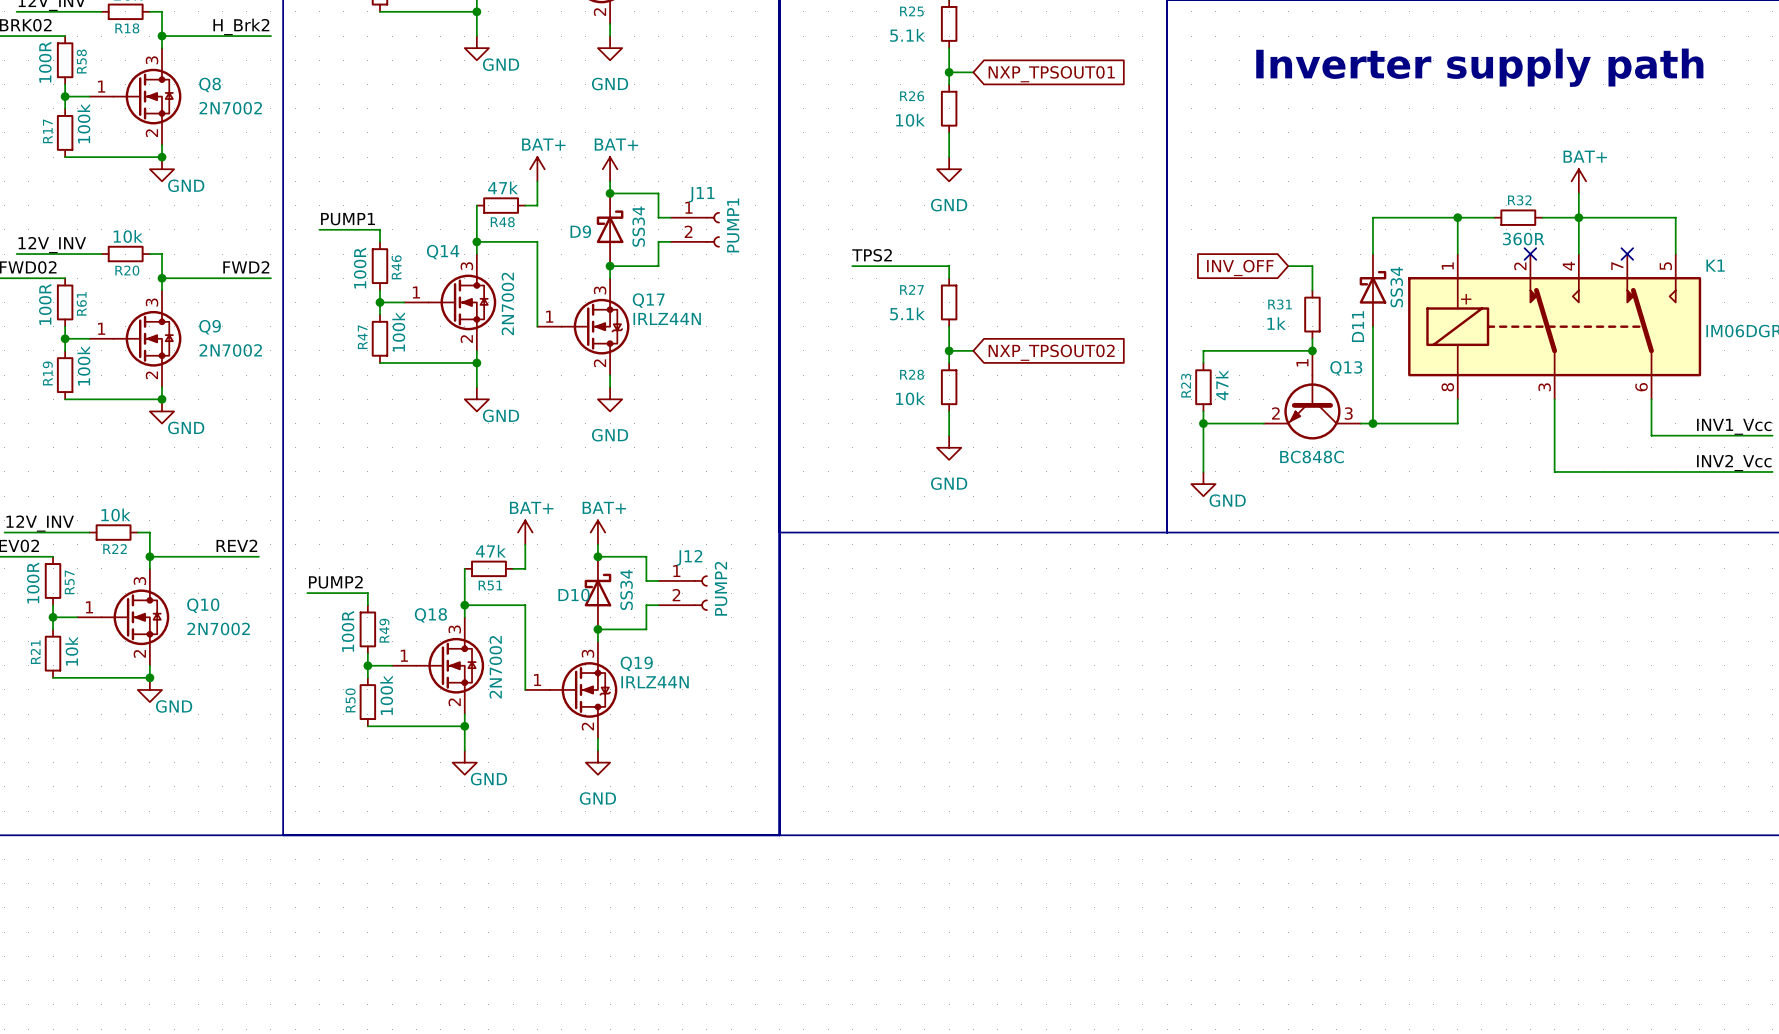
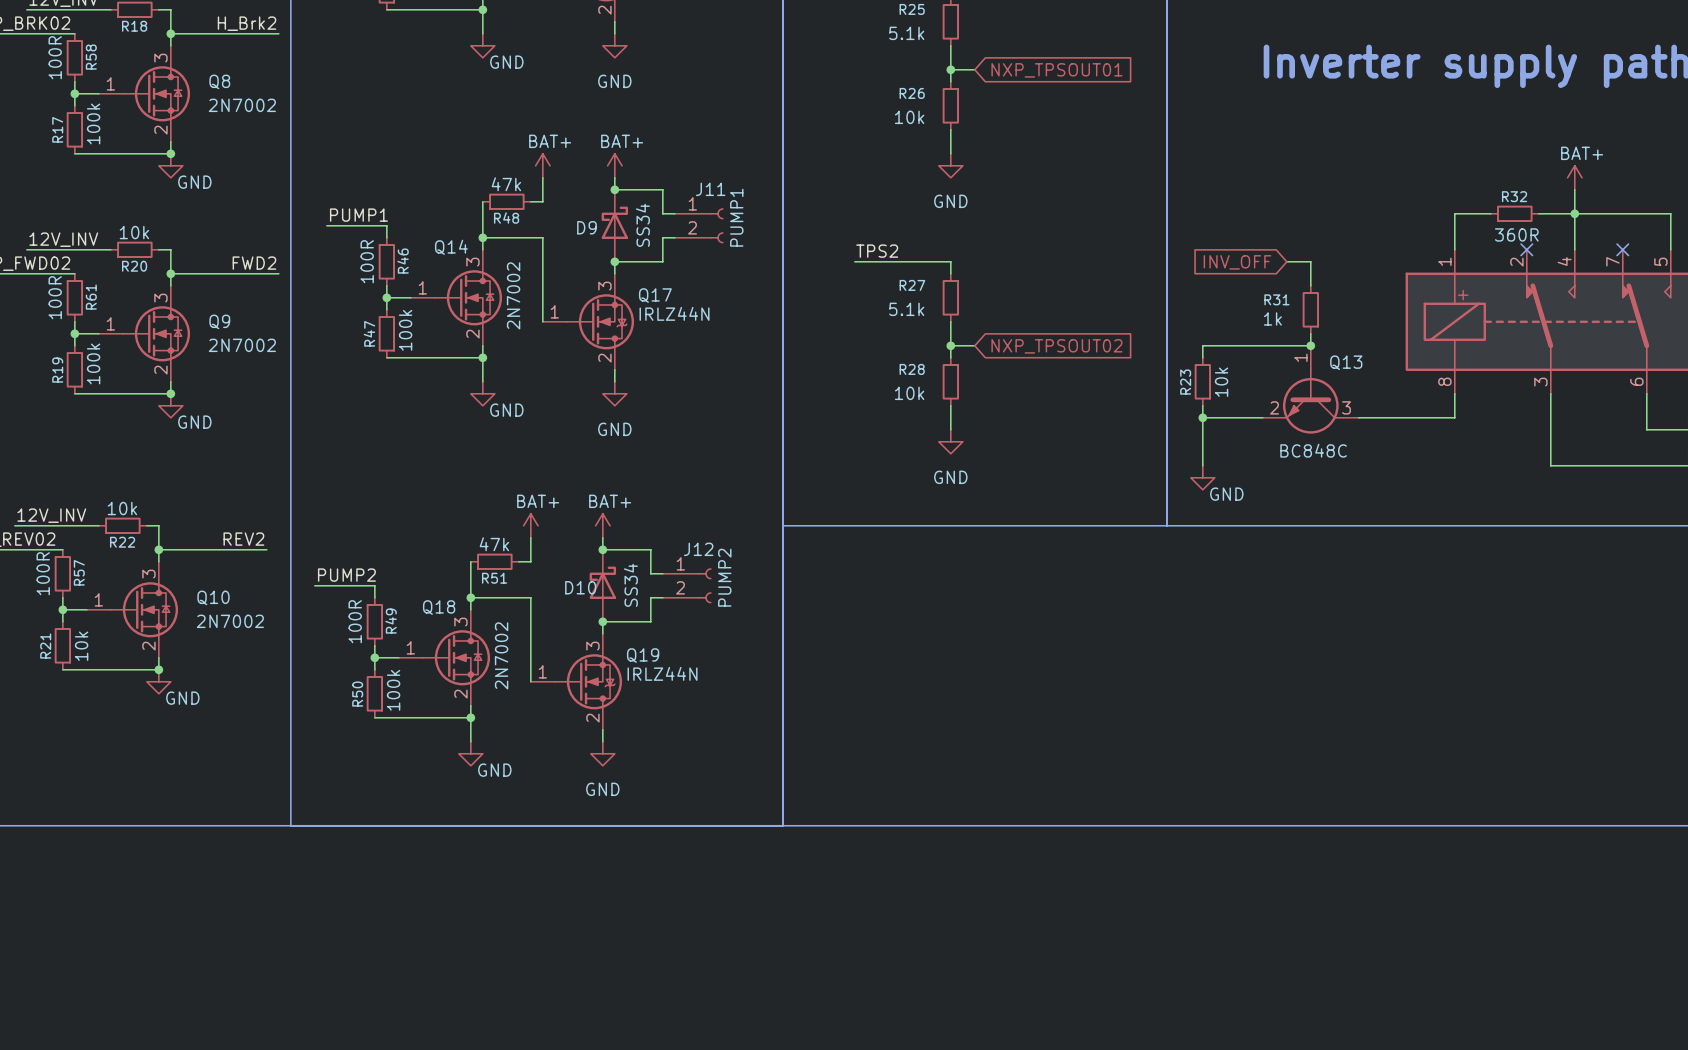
wire: (1457, 217) (1372, 217) (1372, 254) -> none
junction: (1457, 217) -> none
D11: SS34 (1372, 290) -> none
wire: (1372, 326) (1372, 423) -> none
R23 value: 47k (1222, 385) -> 10k (1221, 382)
junction: (1372, 423) -> none

